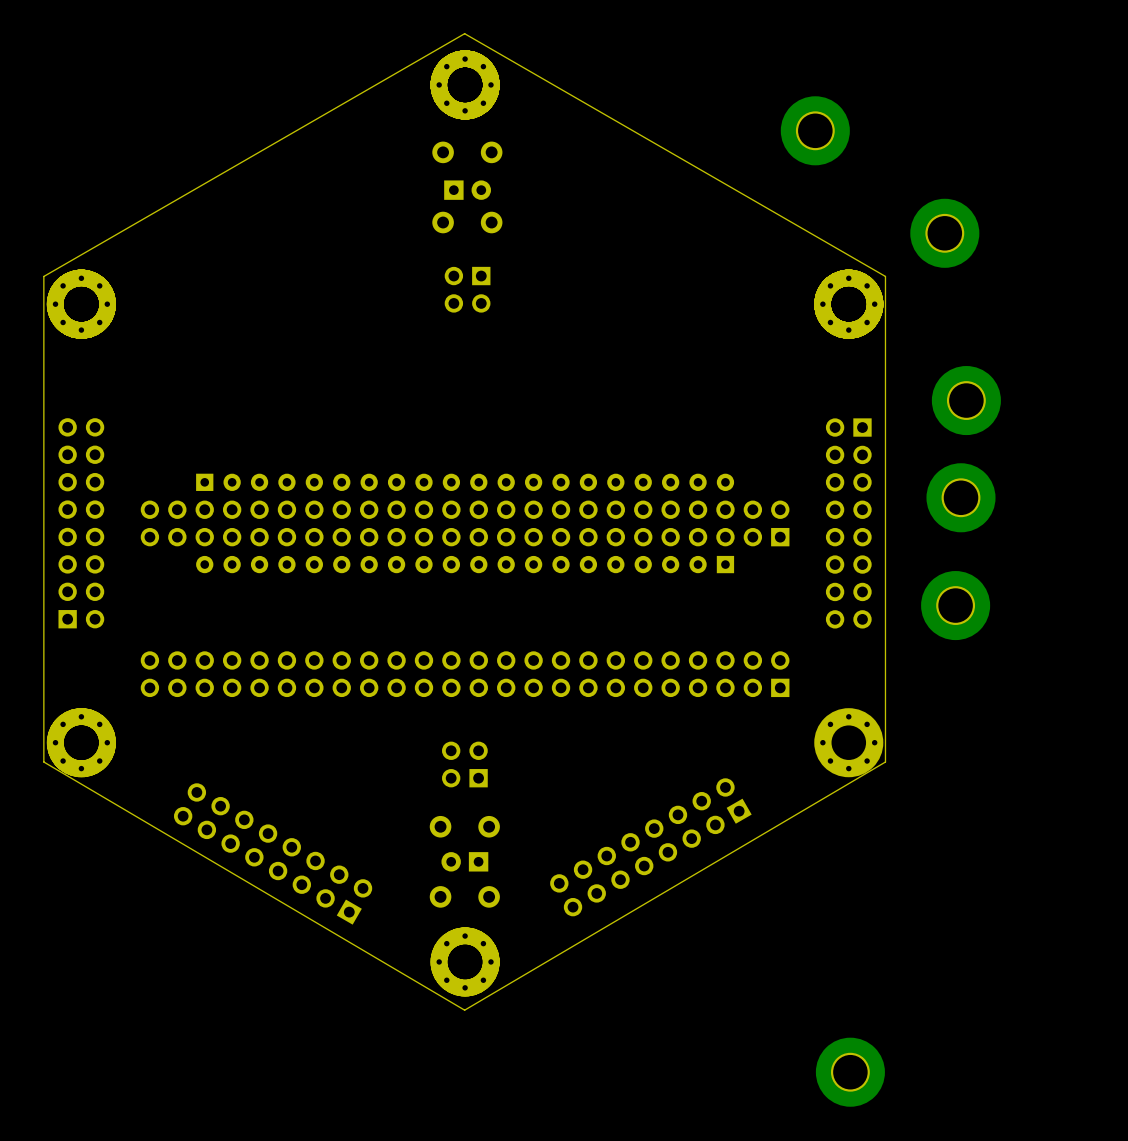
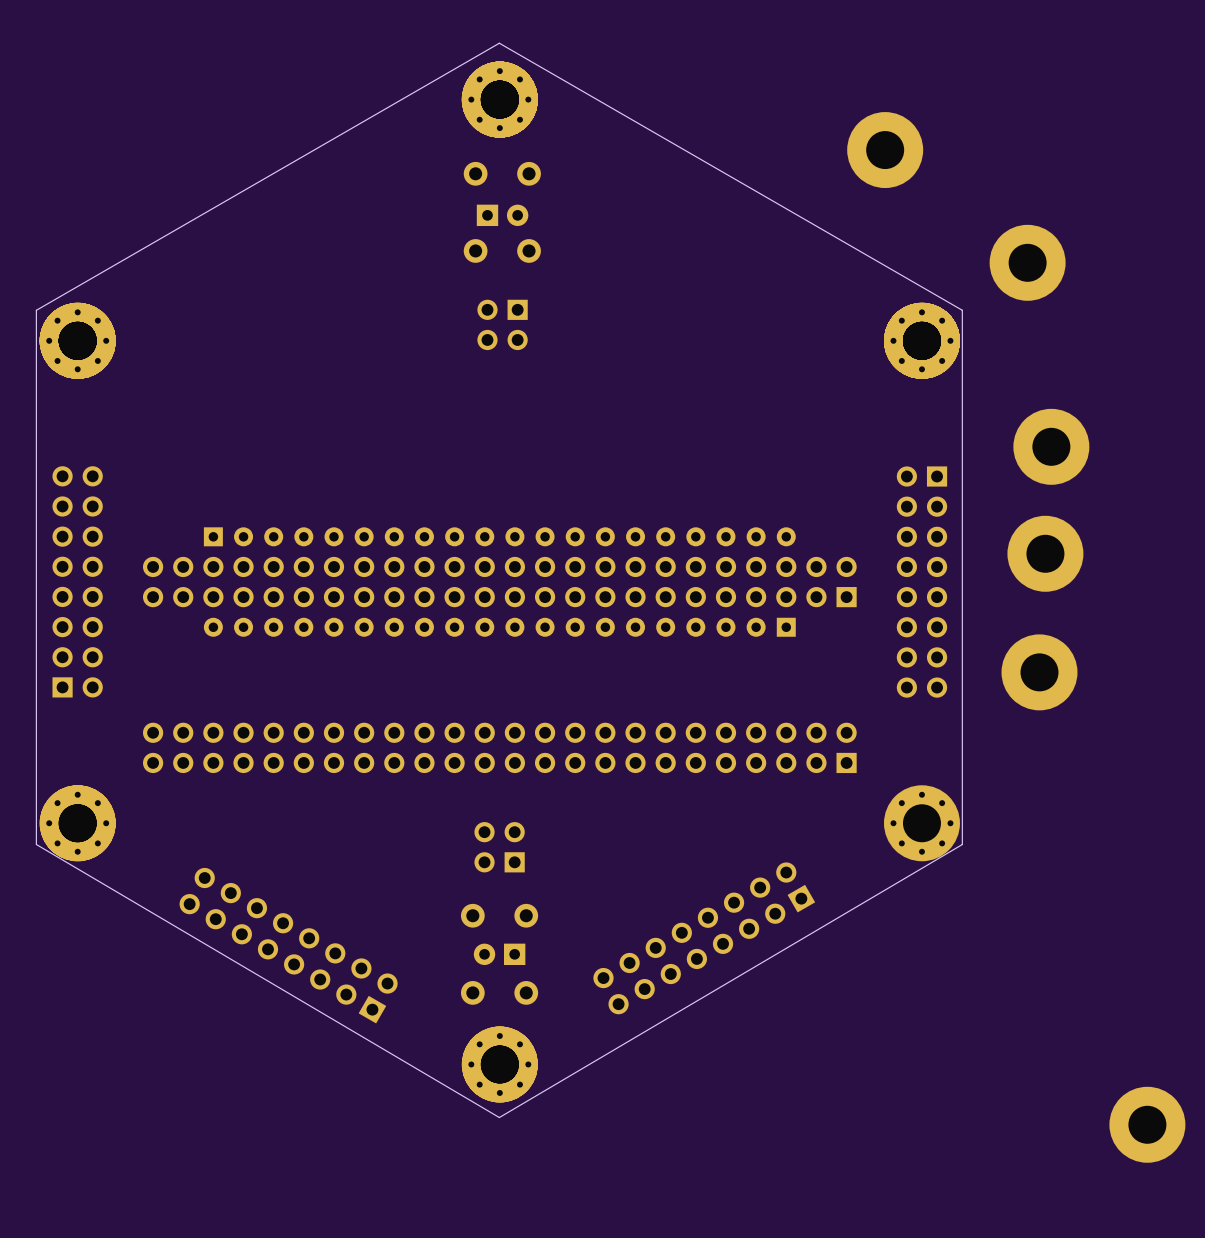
part position: (850, 1072) -> (1147, 1124)

